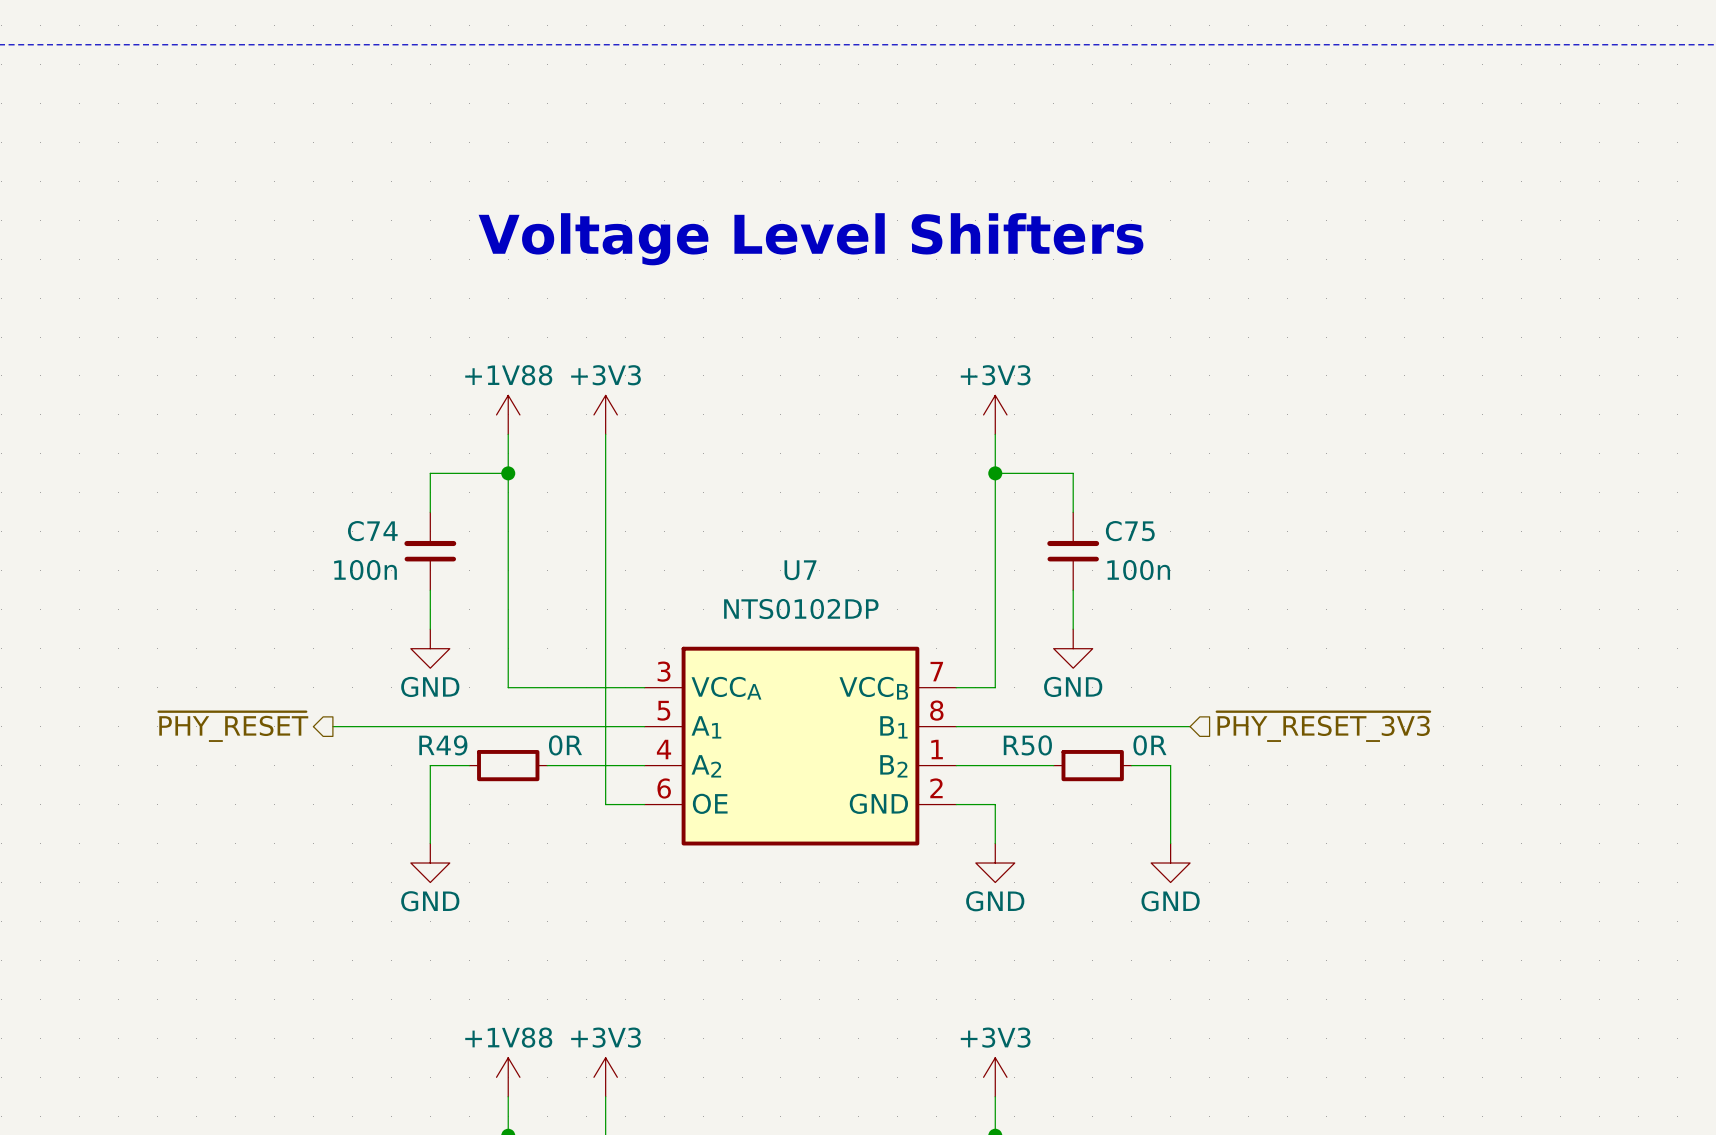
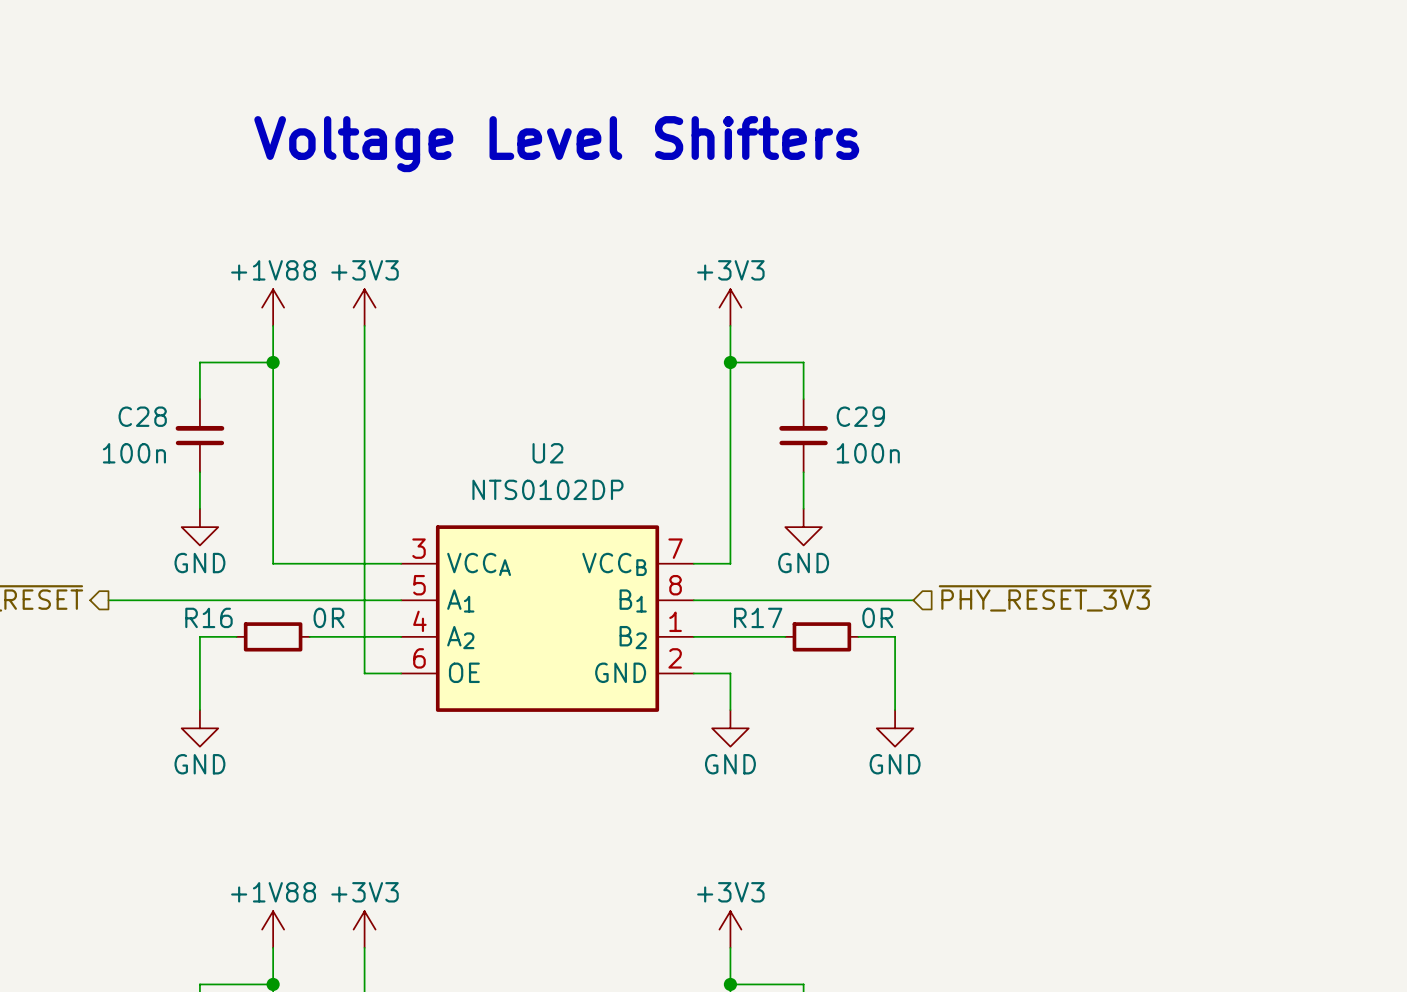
C74 name: C74 (372, 531) -> C28 (142, 416)
C75 name: C75 (1130, 531) -> C29 (860, 416)
U7 name: U7 (800, 570) -> U2 (547, 453)
R49 name: R49 (443, 745) -> R16 (208, 617)
R50 name: R50 (1027, 745) -> R17 (758, 617)

